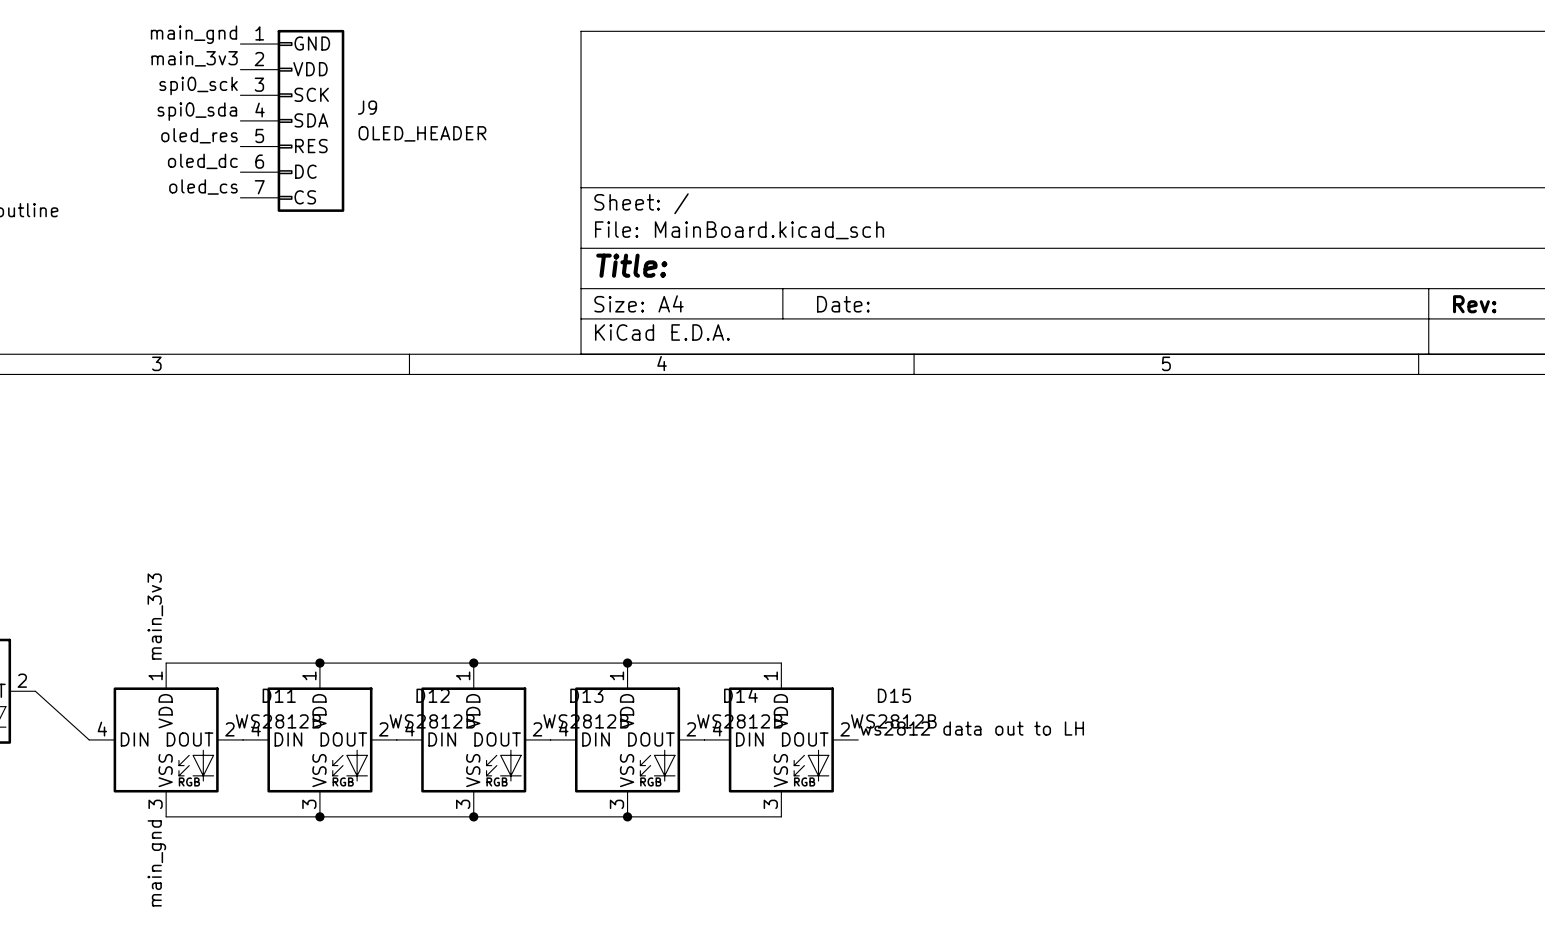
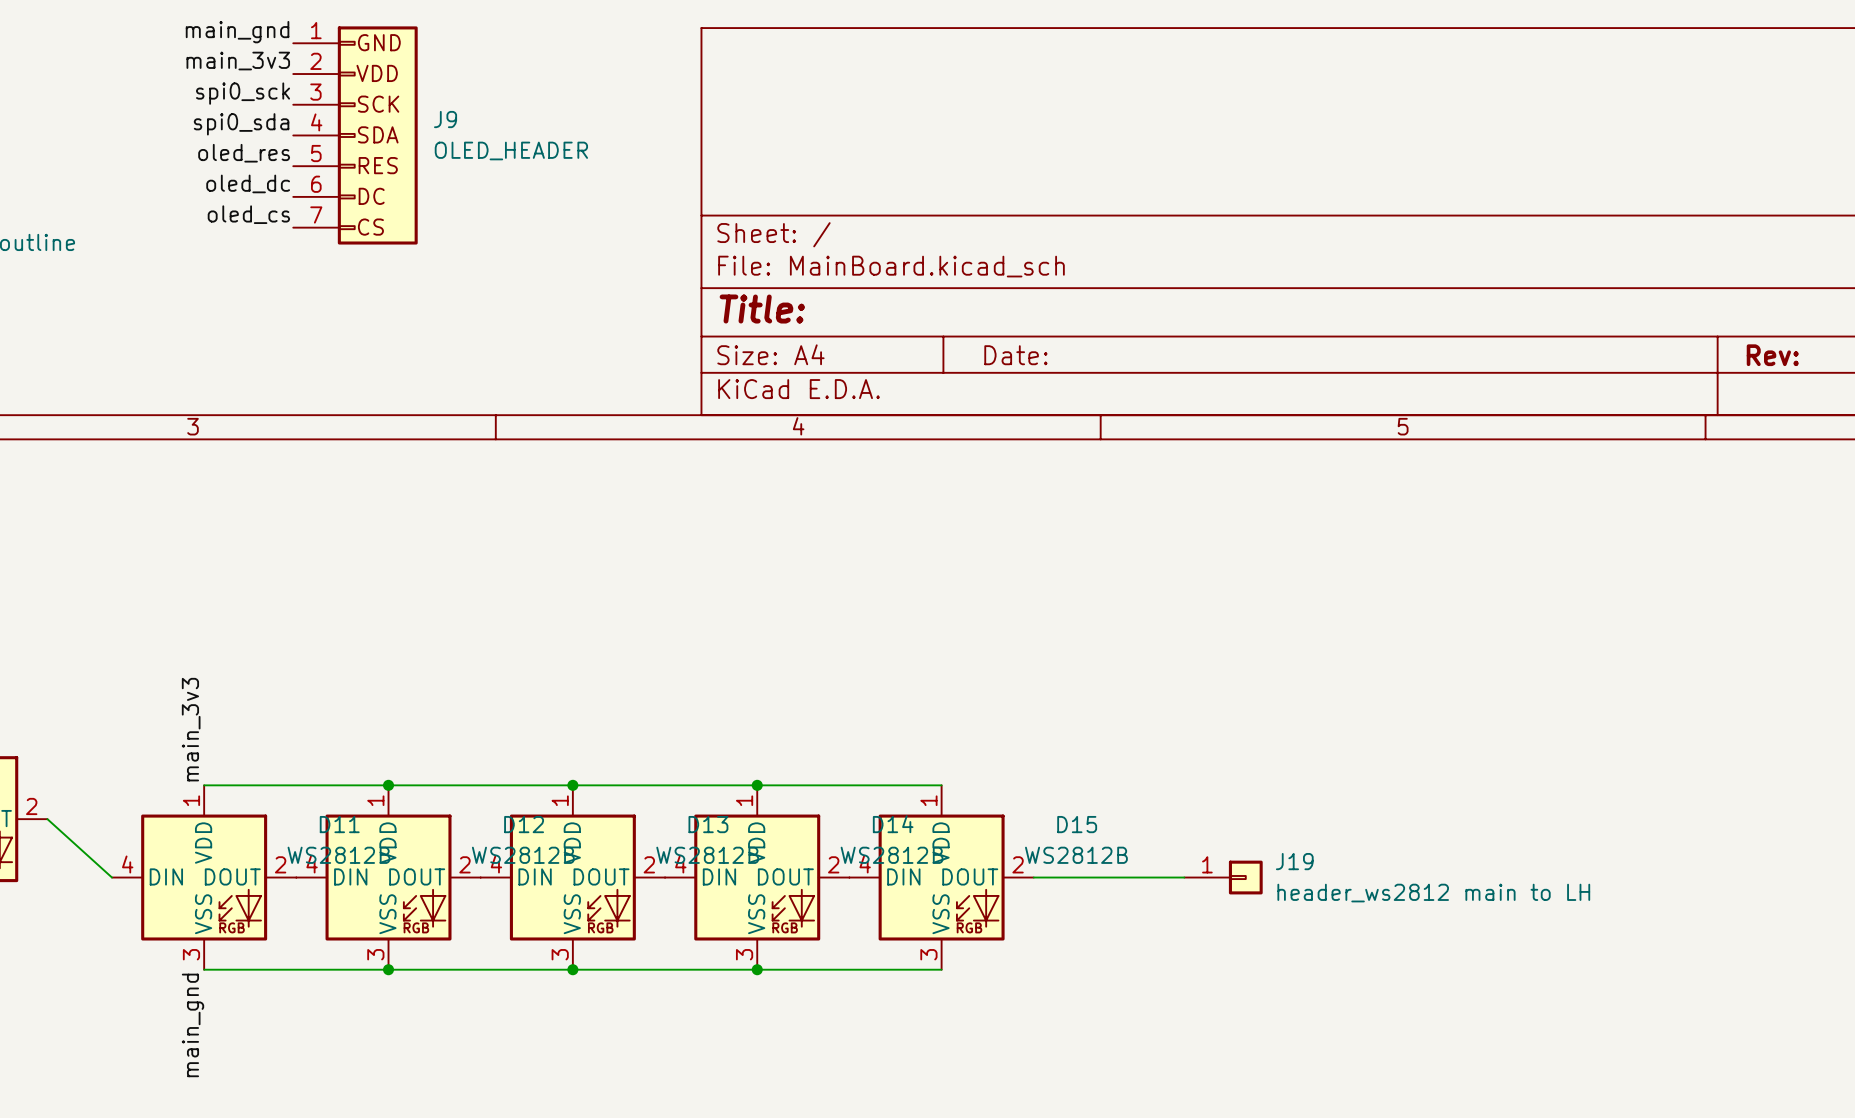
label: ws2812 data out to LH (972, 728) -> none
wire: none -> (1033, 877) (1184, 877)
J19: none -> header_ws2812 main to LH (1223, 877)

